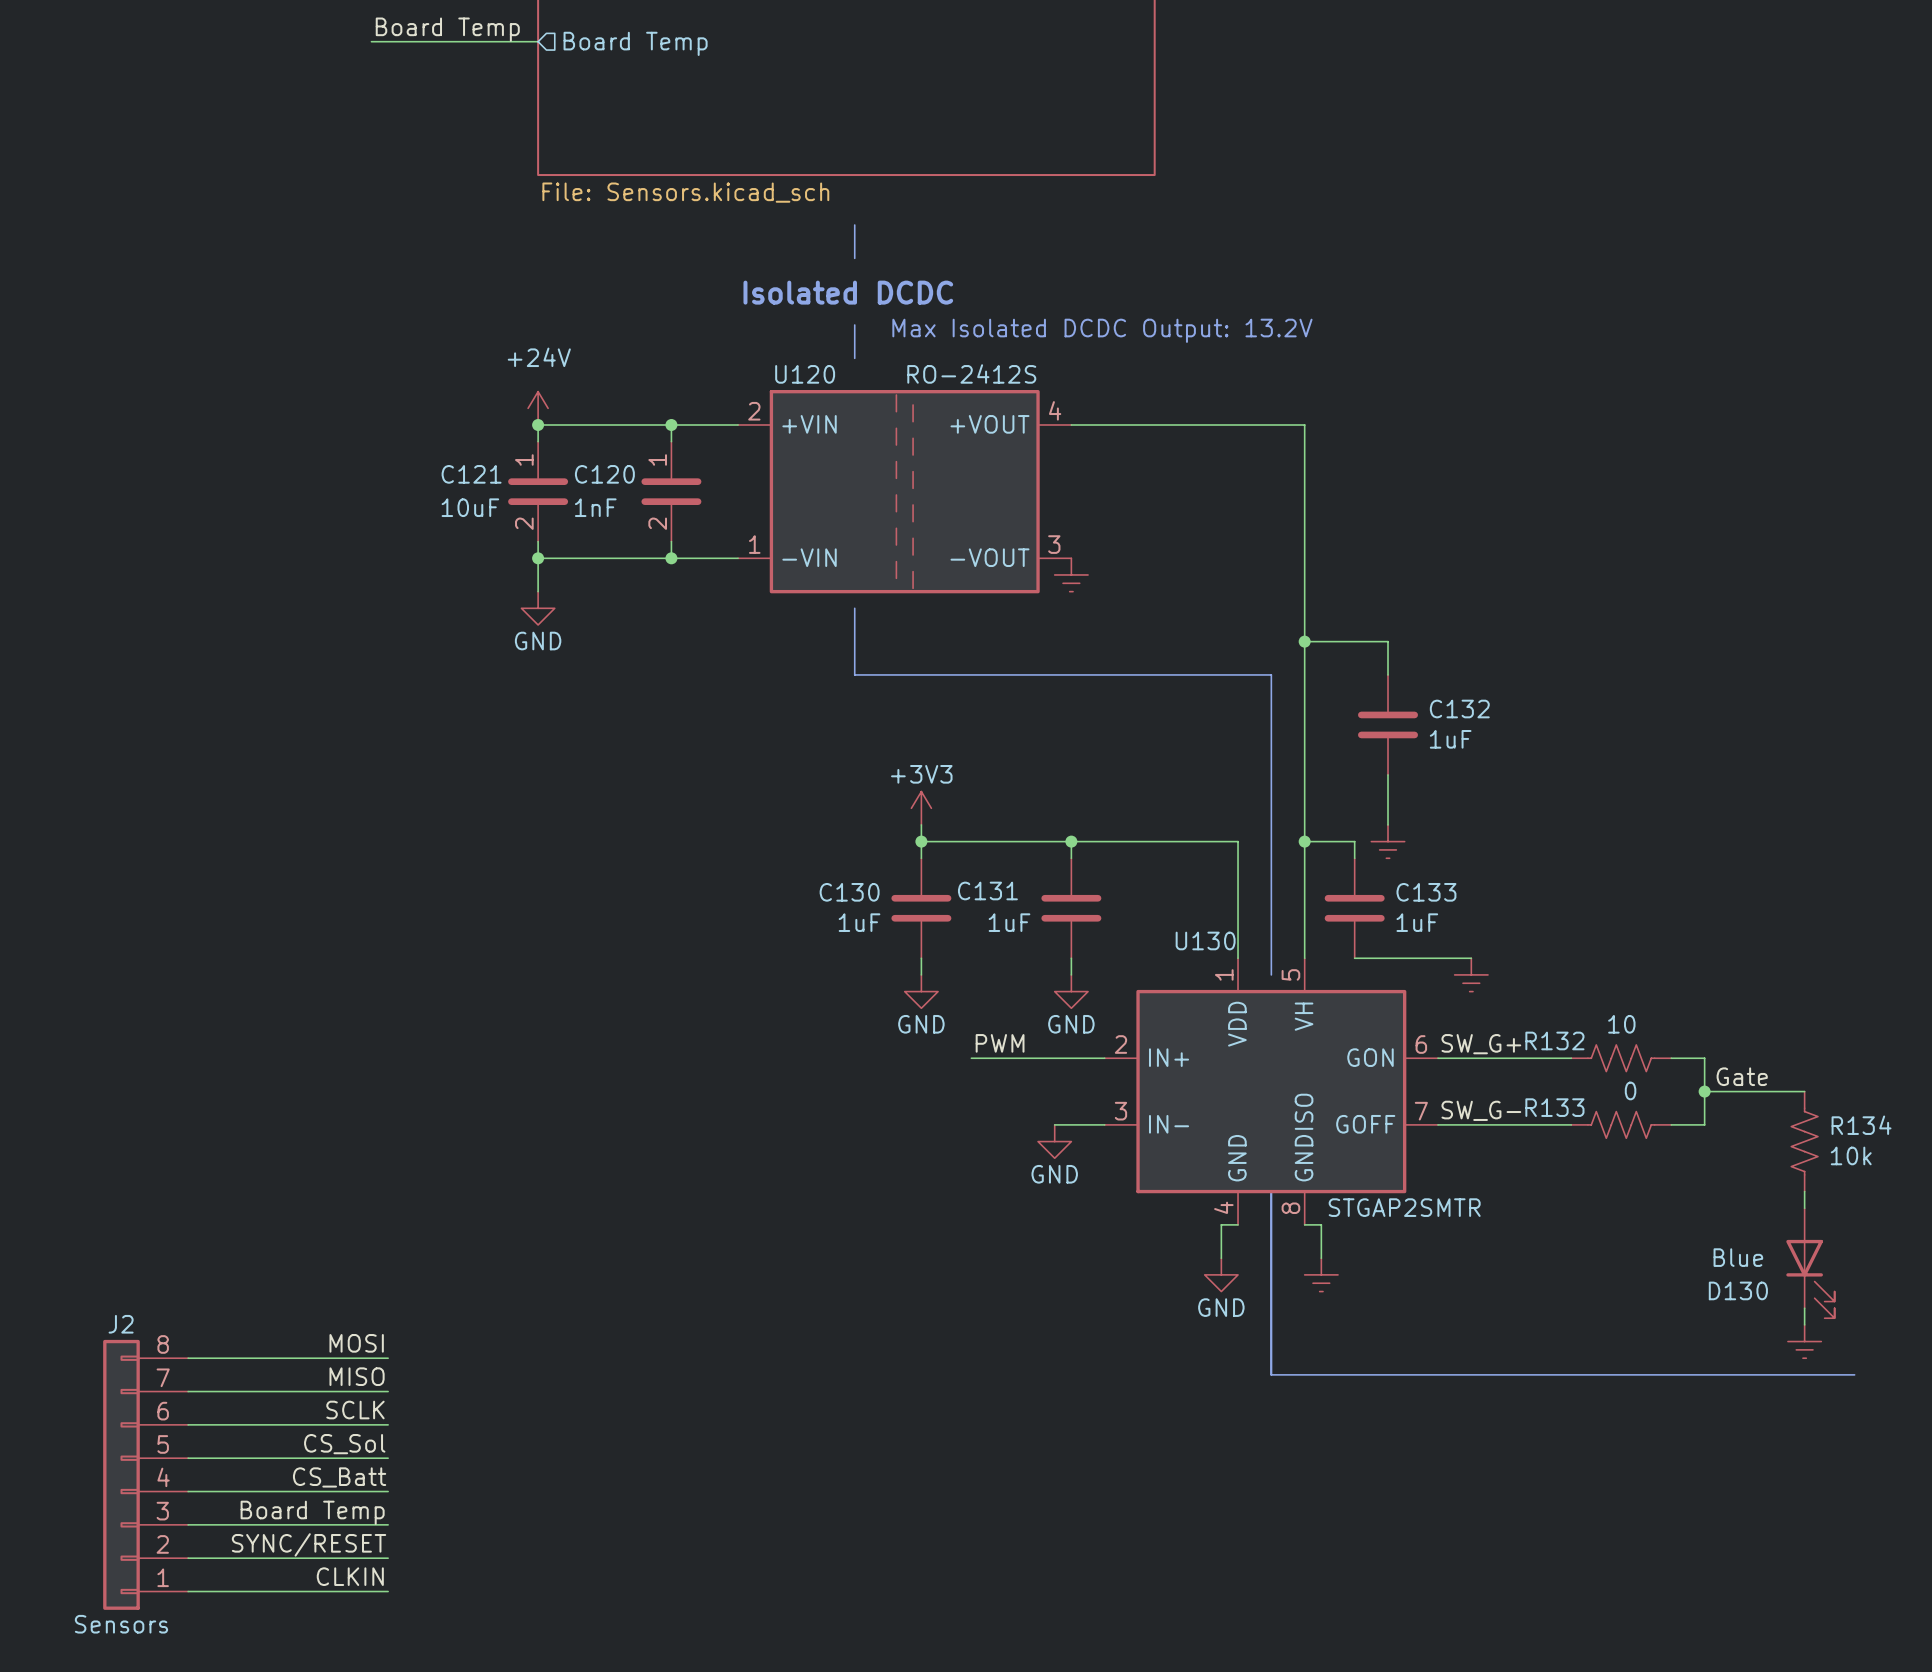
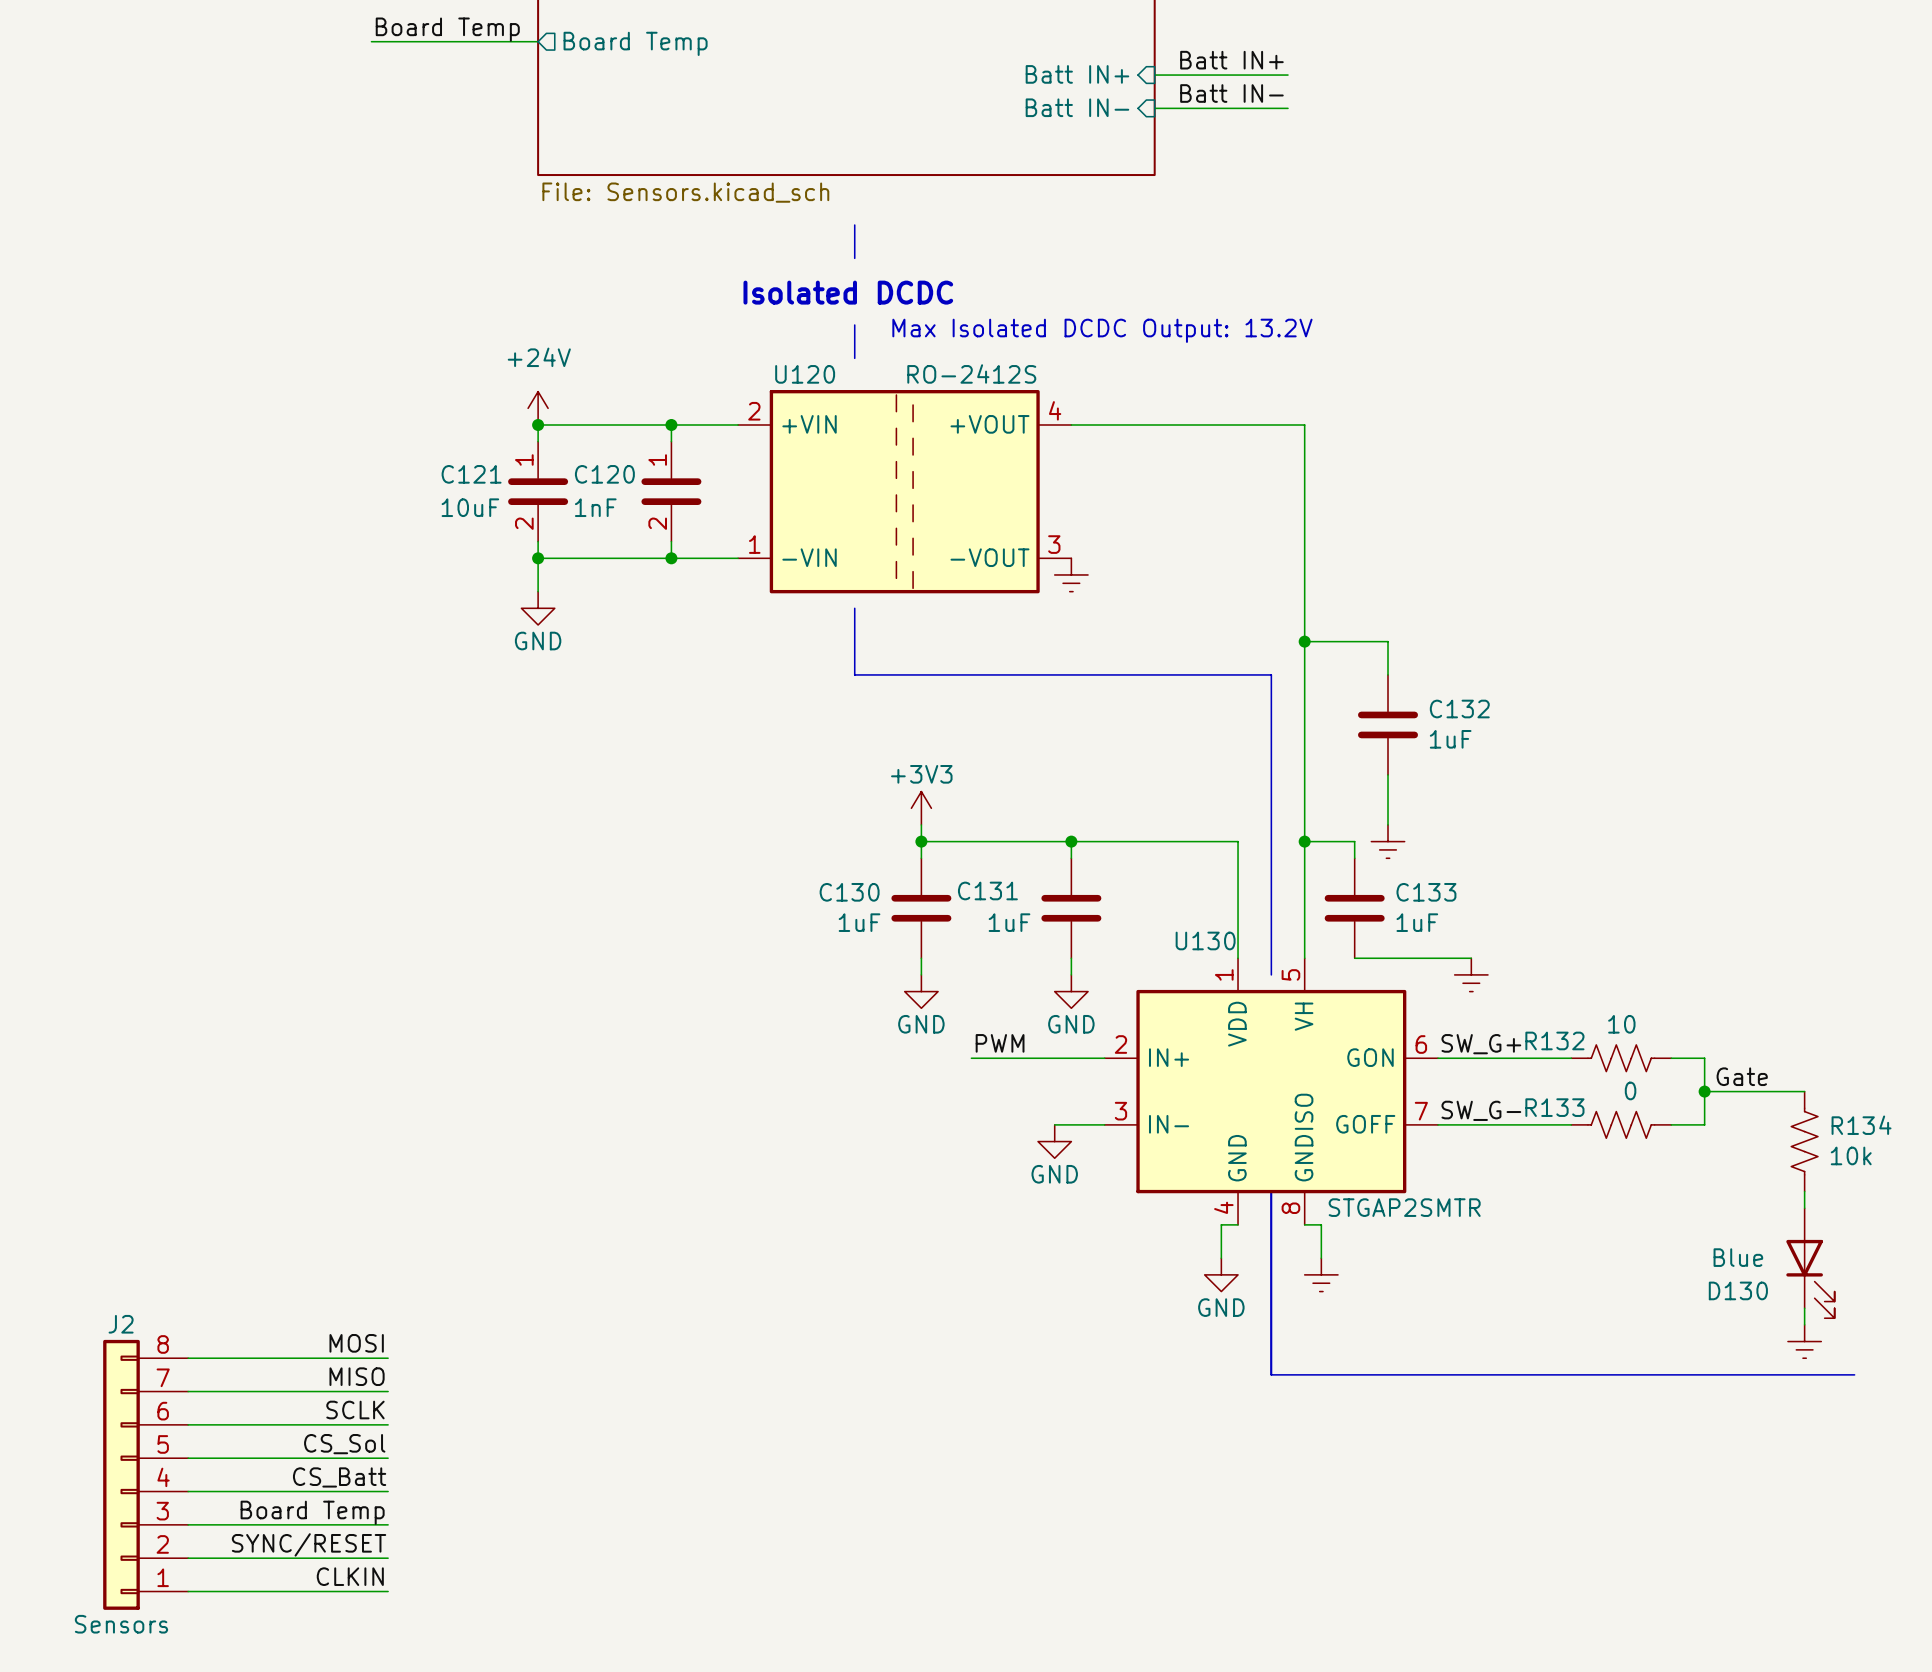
label: none -> Batt IN+ (1231, 60)
sheet pin: none -> Batt IN+ (1077, 74)
wire: none -> (1154, 75) (1288, 75)
label: none -> Batt IN- (1231, 93)
sheet pin: none -> Batt IN- (1077, 107)
wire: none -> (1154, 108) (1288, 108)

